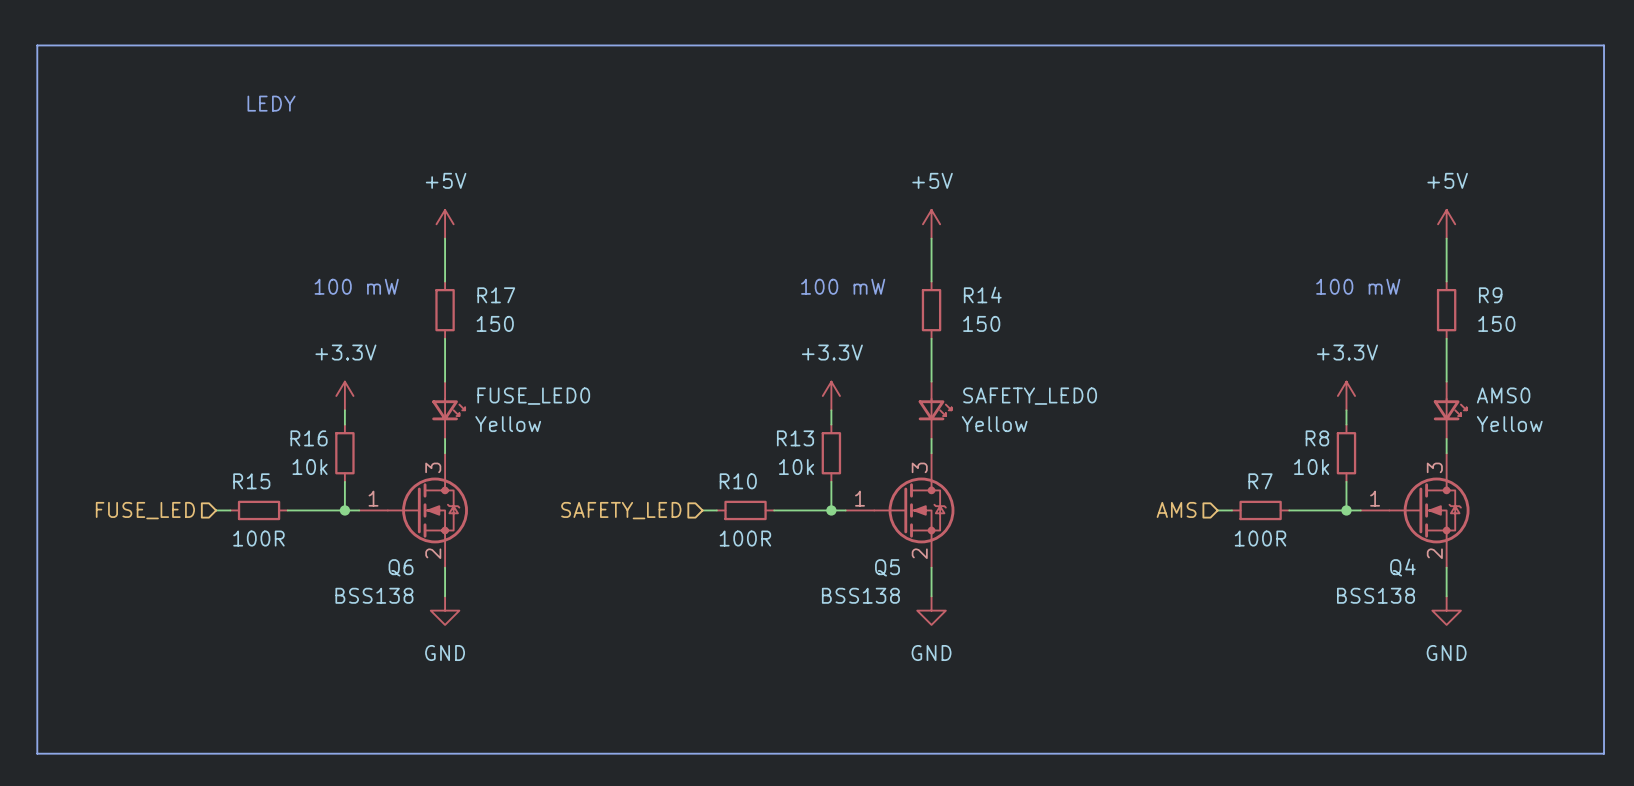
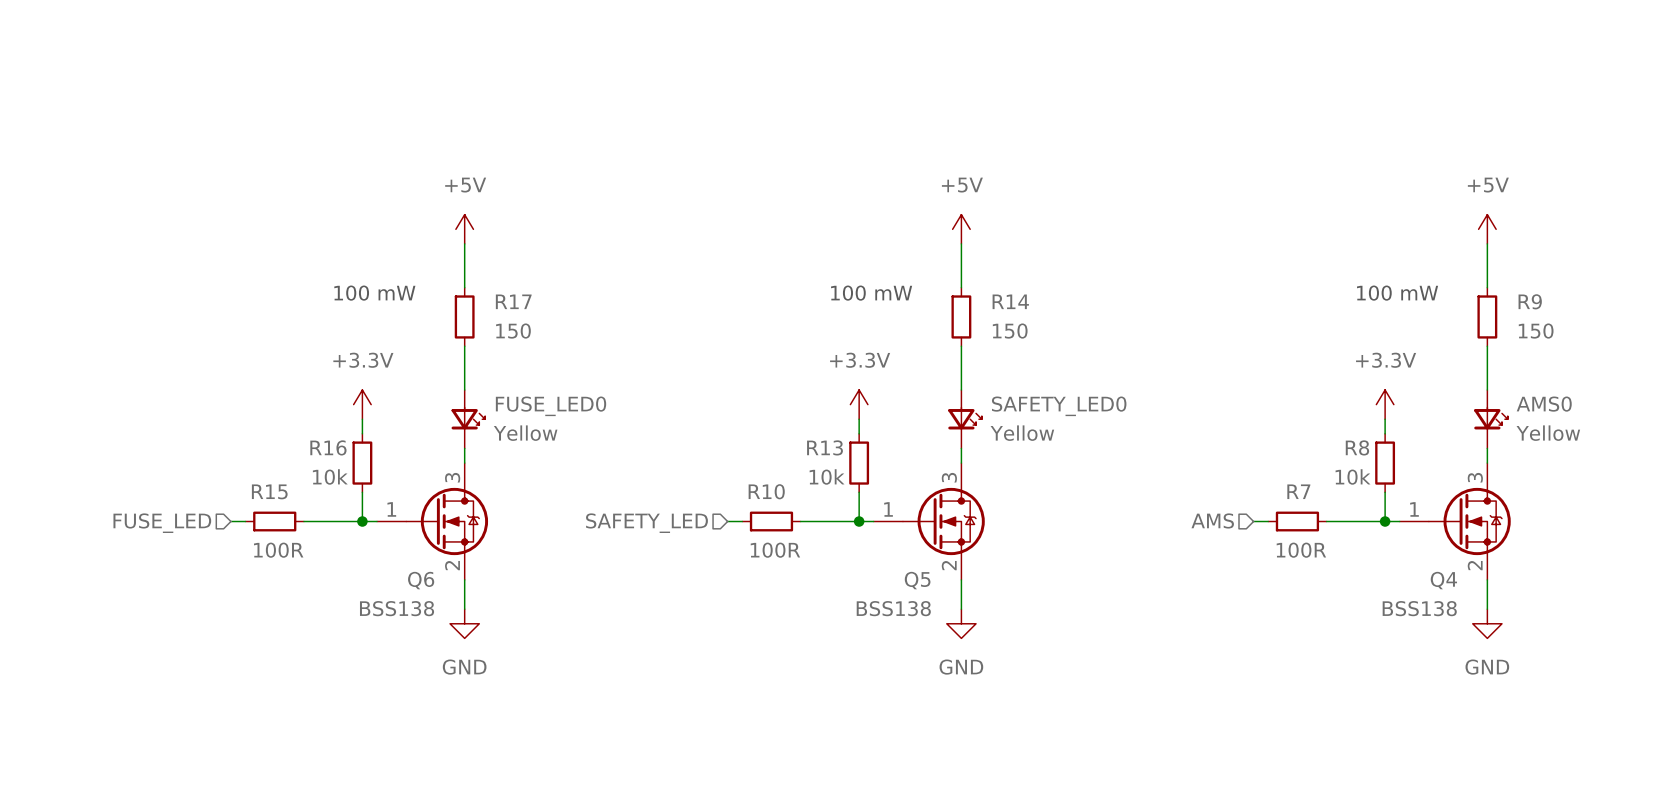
line: (37, 45) (1604, 45) (1604, 753) (37, 753) (37, 45) -> none
text: LEDY (271, 103) -> none

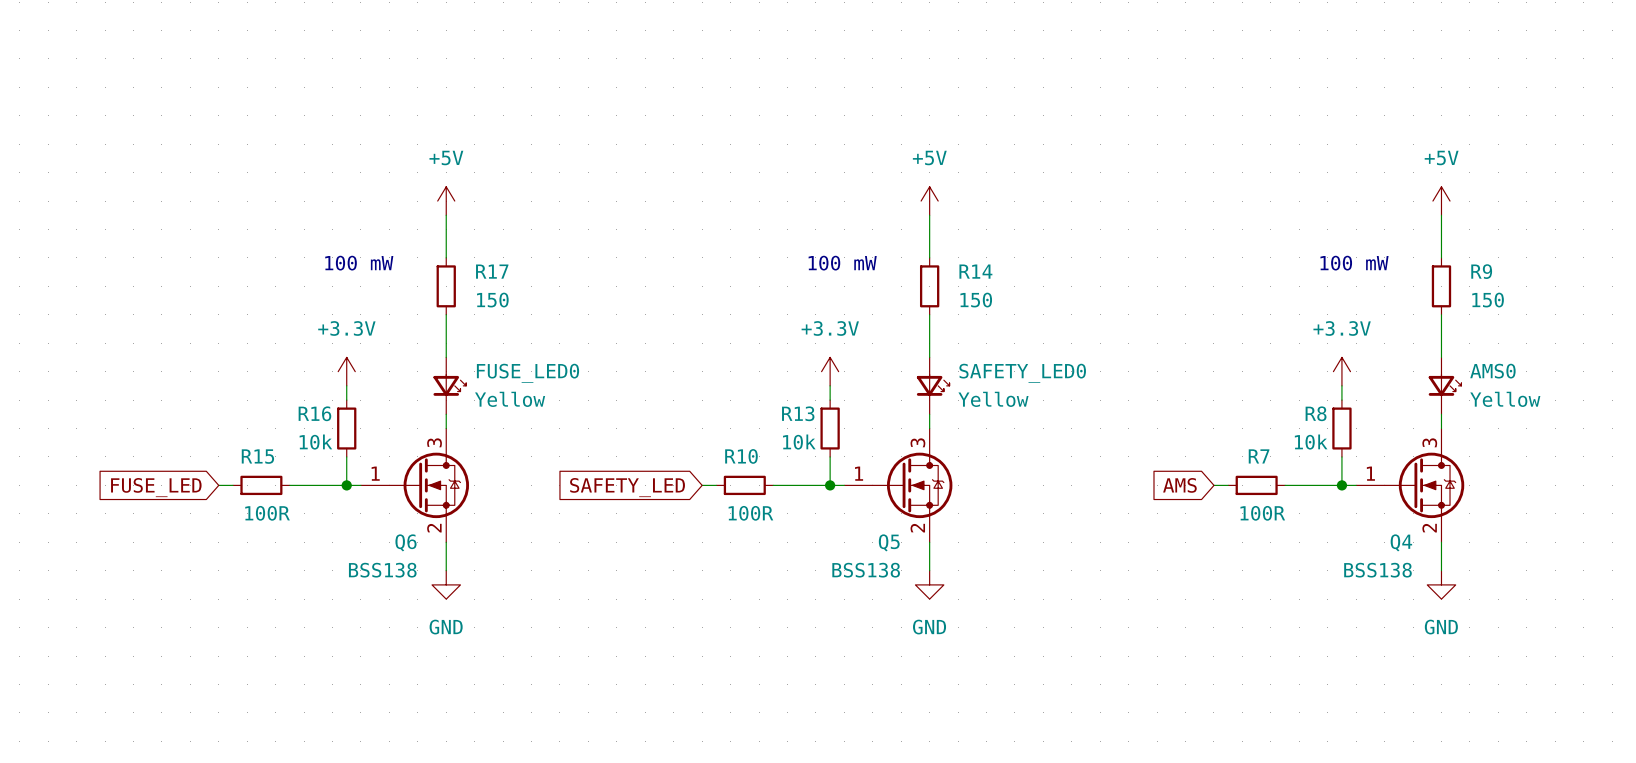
hierarchical label: AMS (1212, 520) -> none
global label: none -> AMS (1179, 485)
hierarchical label: FUSE_LED (162, 523) -> none
global label: none -> FUSE_LED (156, 487)
hierarchical label: SAFETY_LED (646, 523) -> none
global label: none -> SAFETY_LED (627, 487)

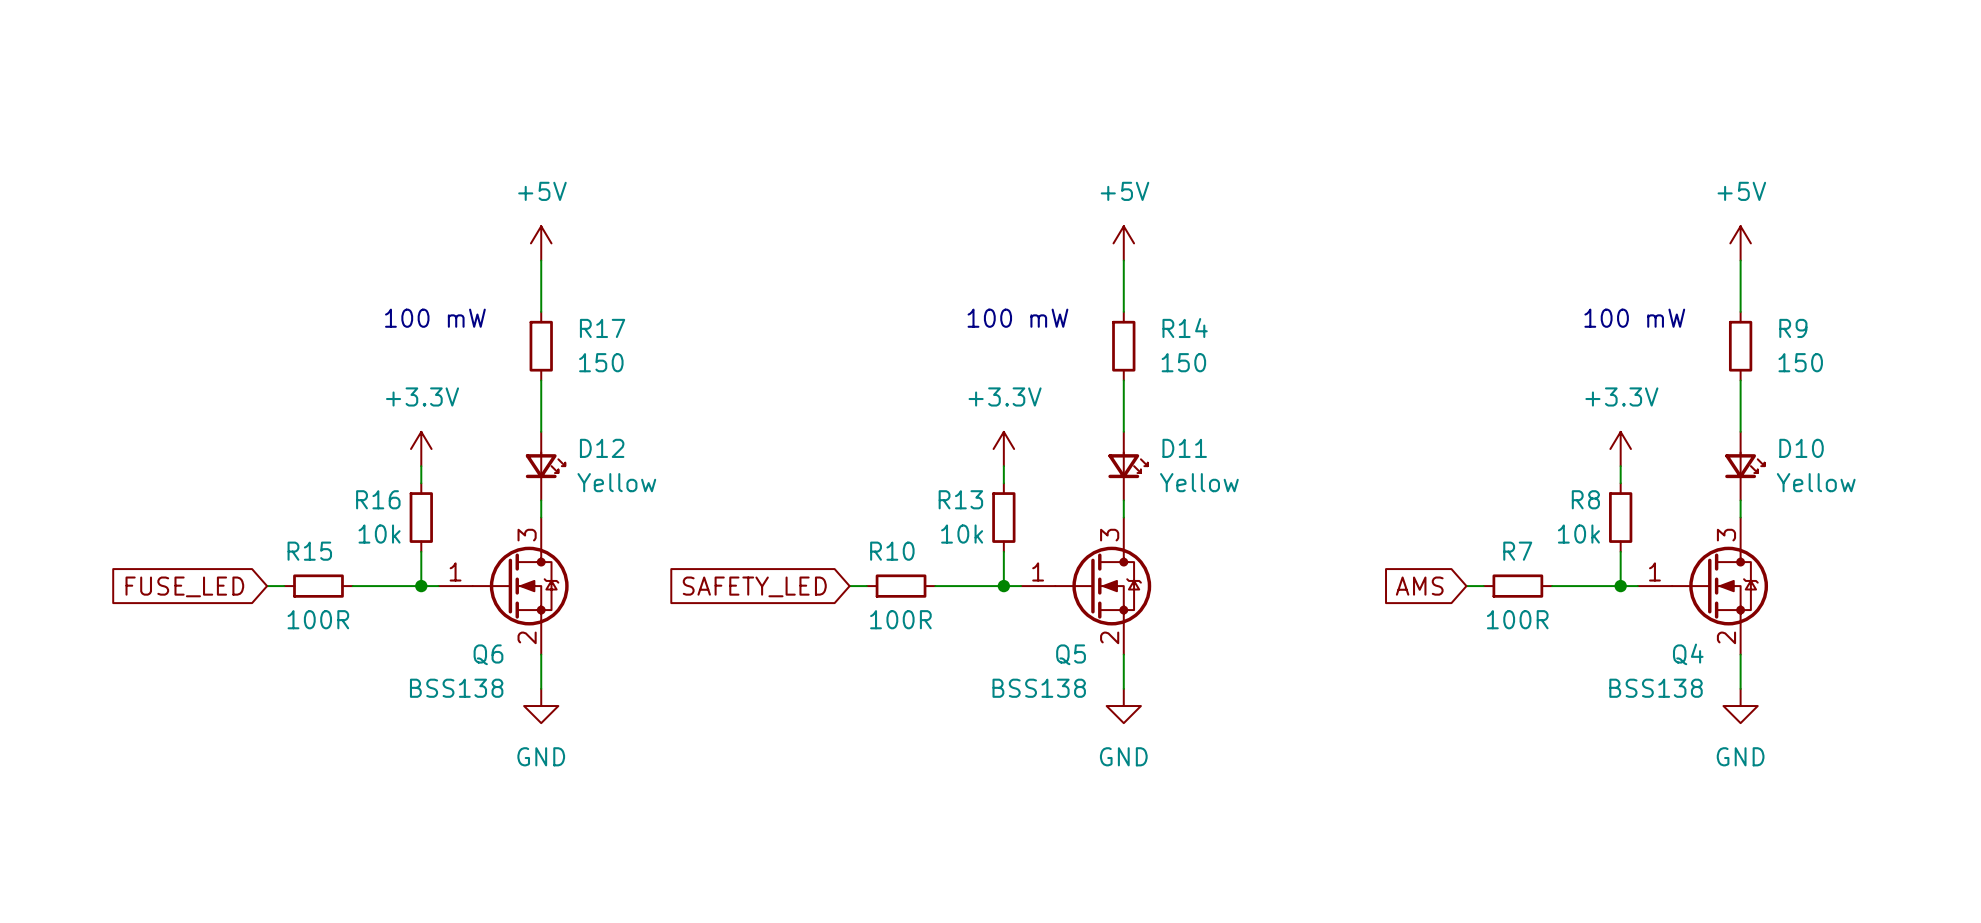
AMS0 name: AMS0 (1492, 371) -> D10 (1801, 448)
FUSE_LED0 name: FUSE_LED0 (527, 373) -> D12 (602, 448)
SAFETY_LED0 name: SAFETY_LED0 (1022, 373) -> D11 (1184, 448)

